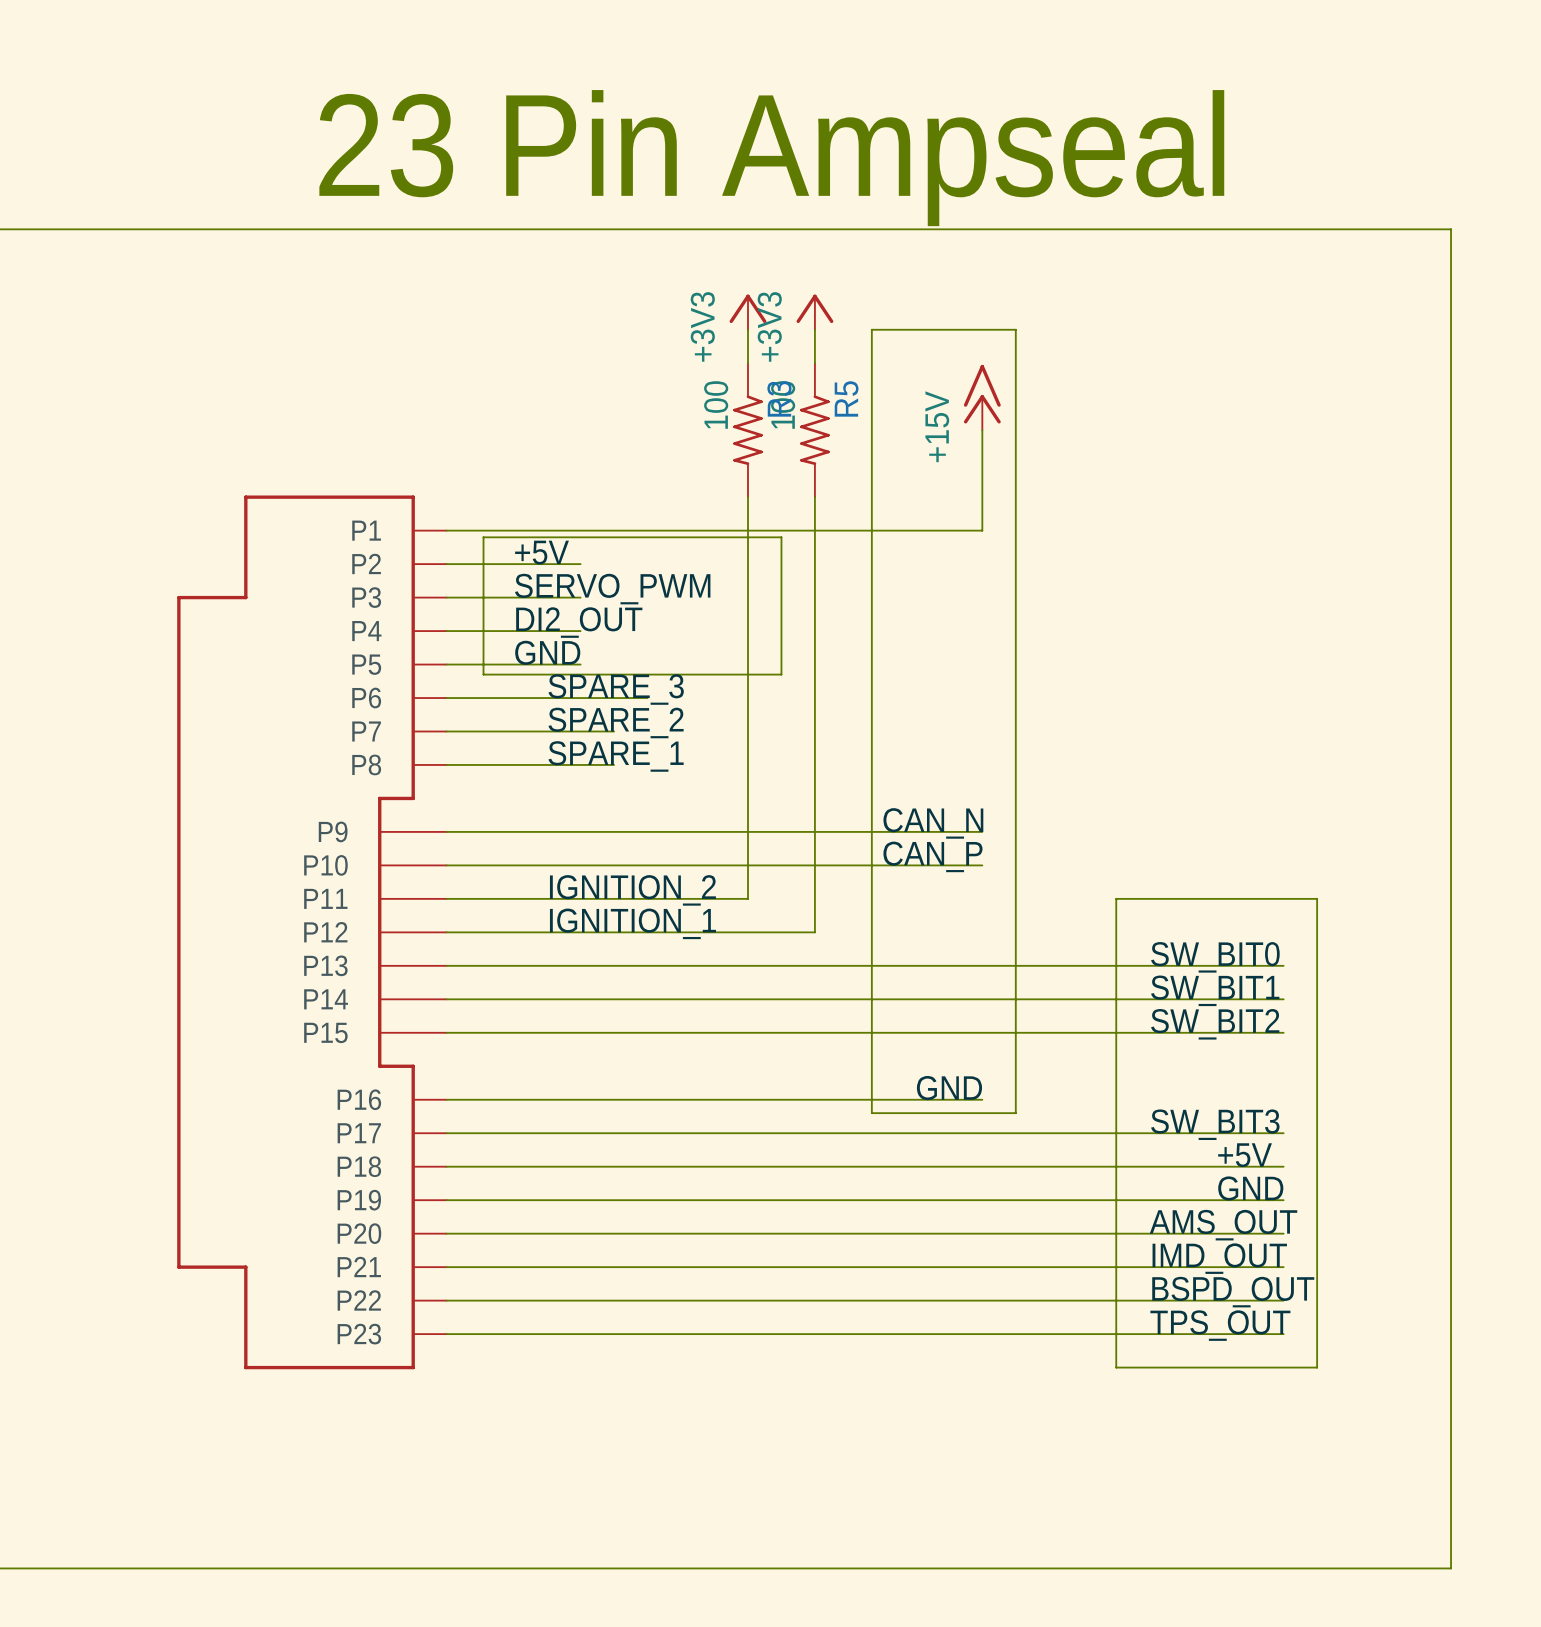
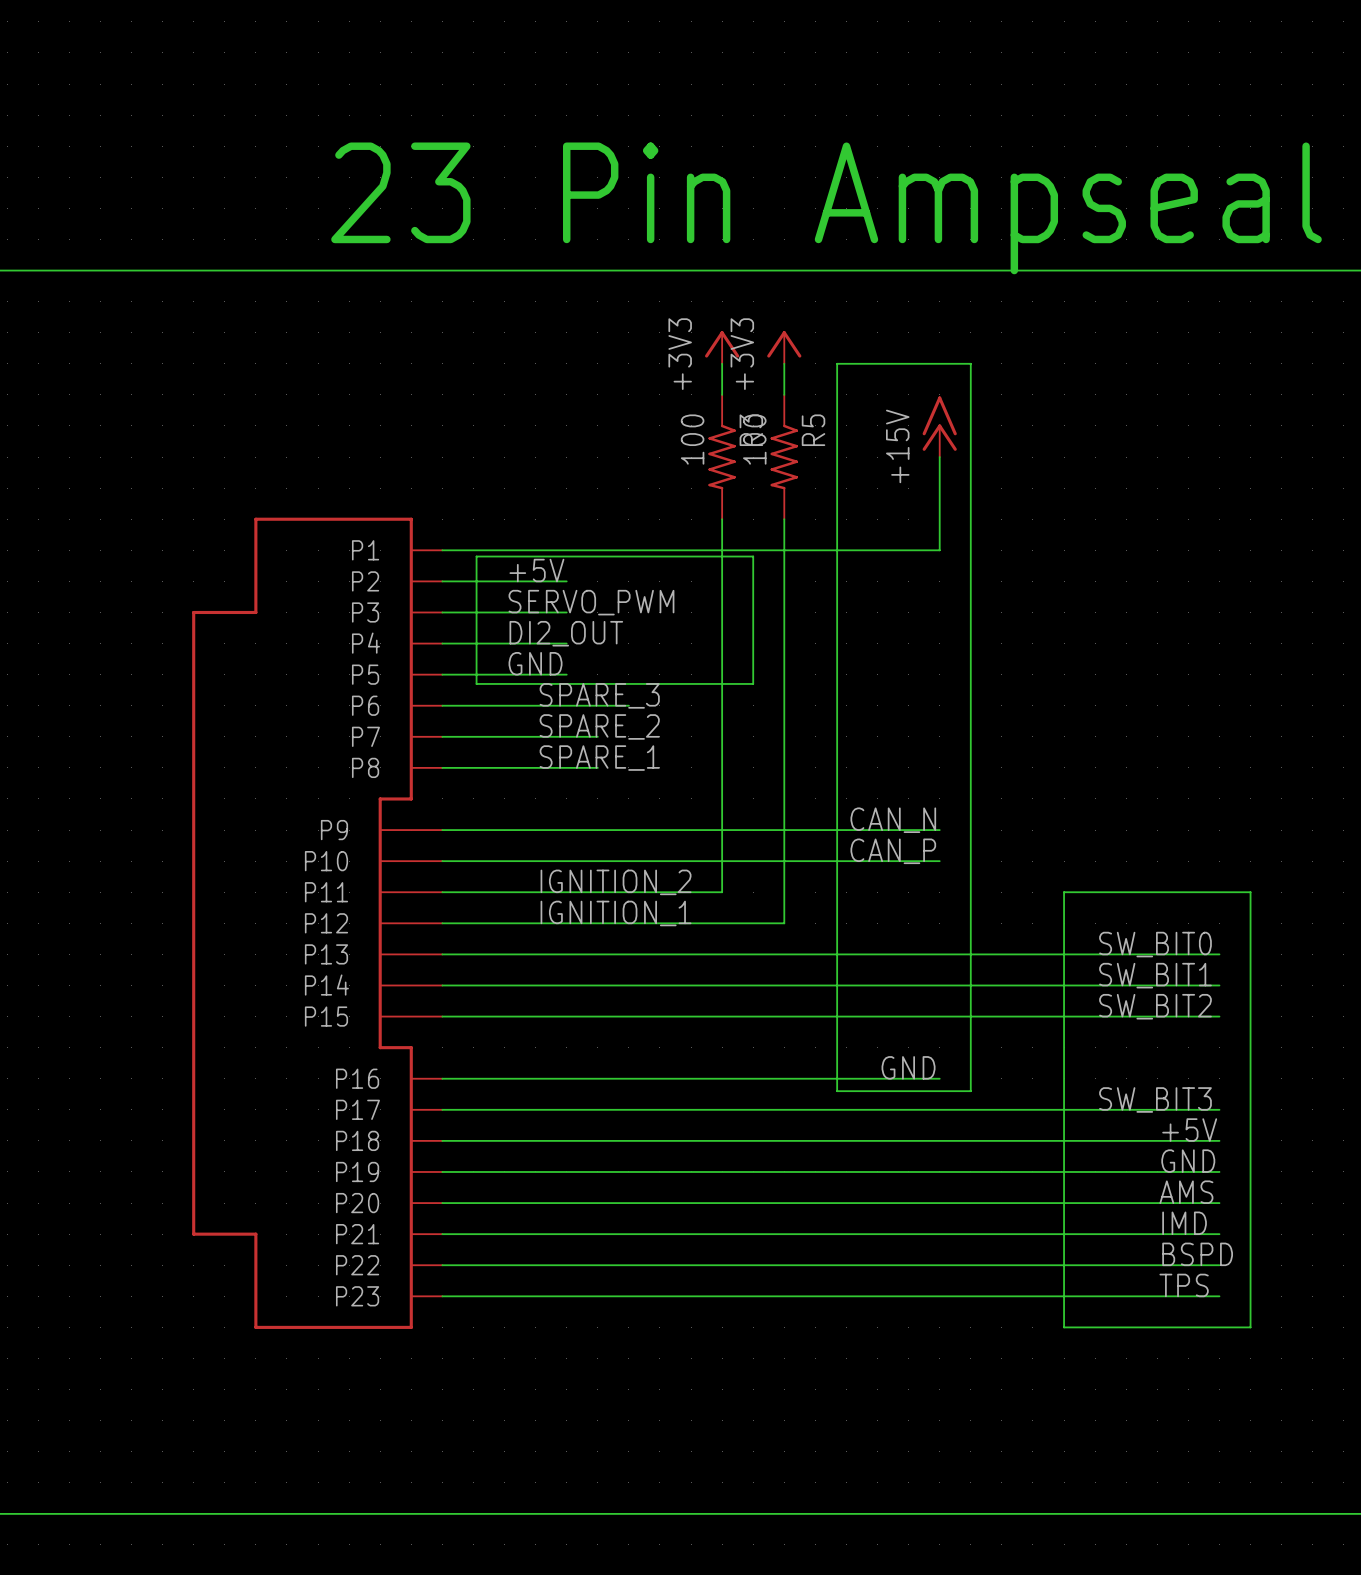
label: none -> AMS (1186, 1192)
label: AMS_OUT (1223, 1225) -> none
label: none -> IMD (1184, 1223)
label: IMD_OUT (1219, 1258) -> none
label: BSPD_OUT (1233, 1292) -> BSPD (1197, 1254)
label: none -> TPS (1184, 1285)
label: TPS_OUT (1220, 1325) -> none

